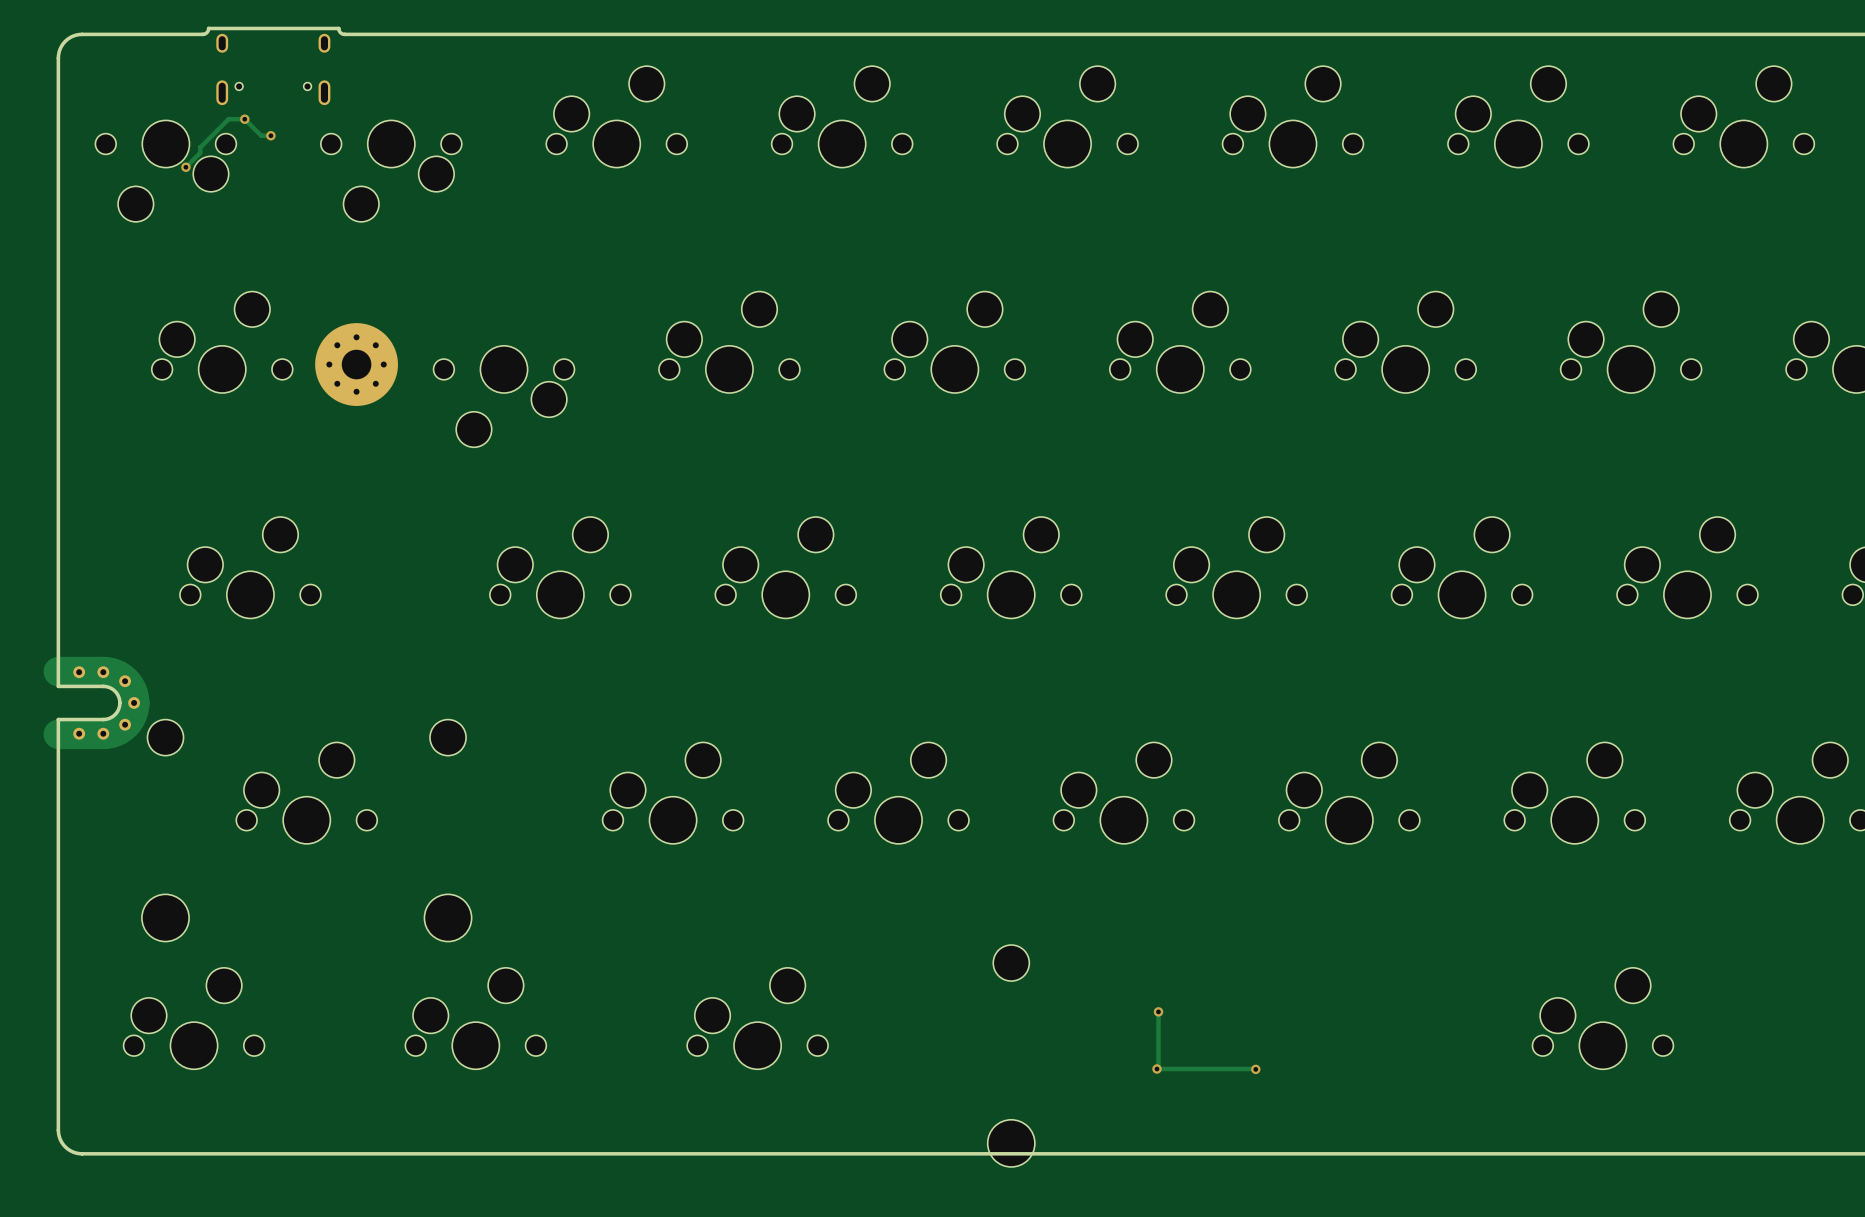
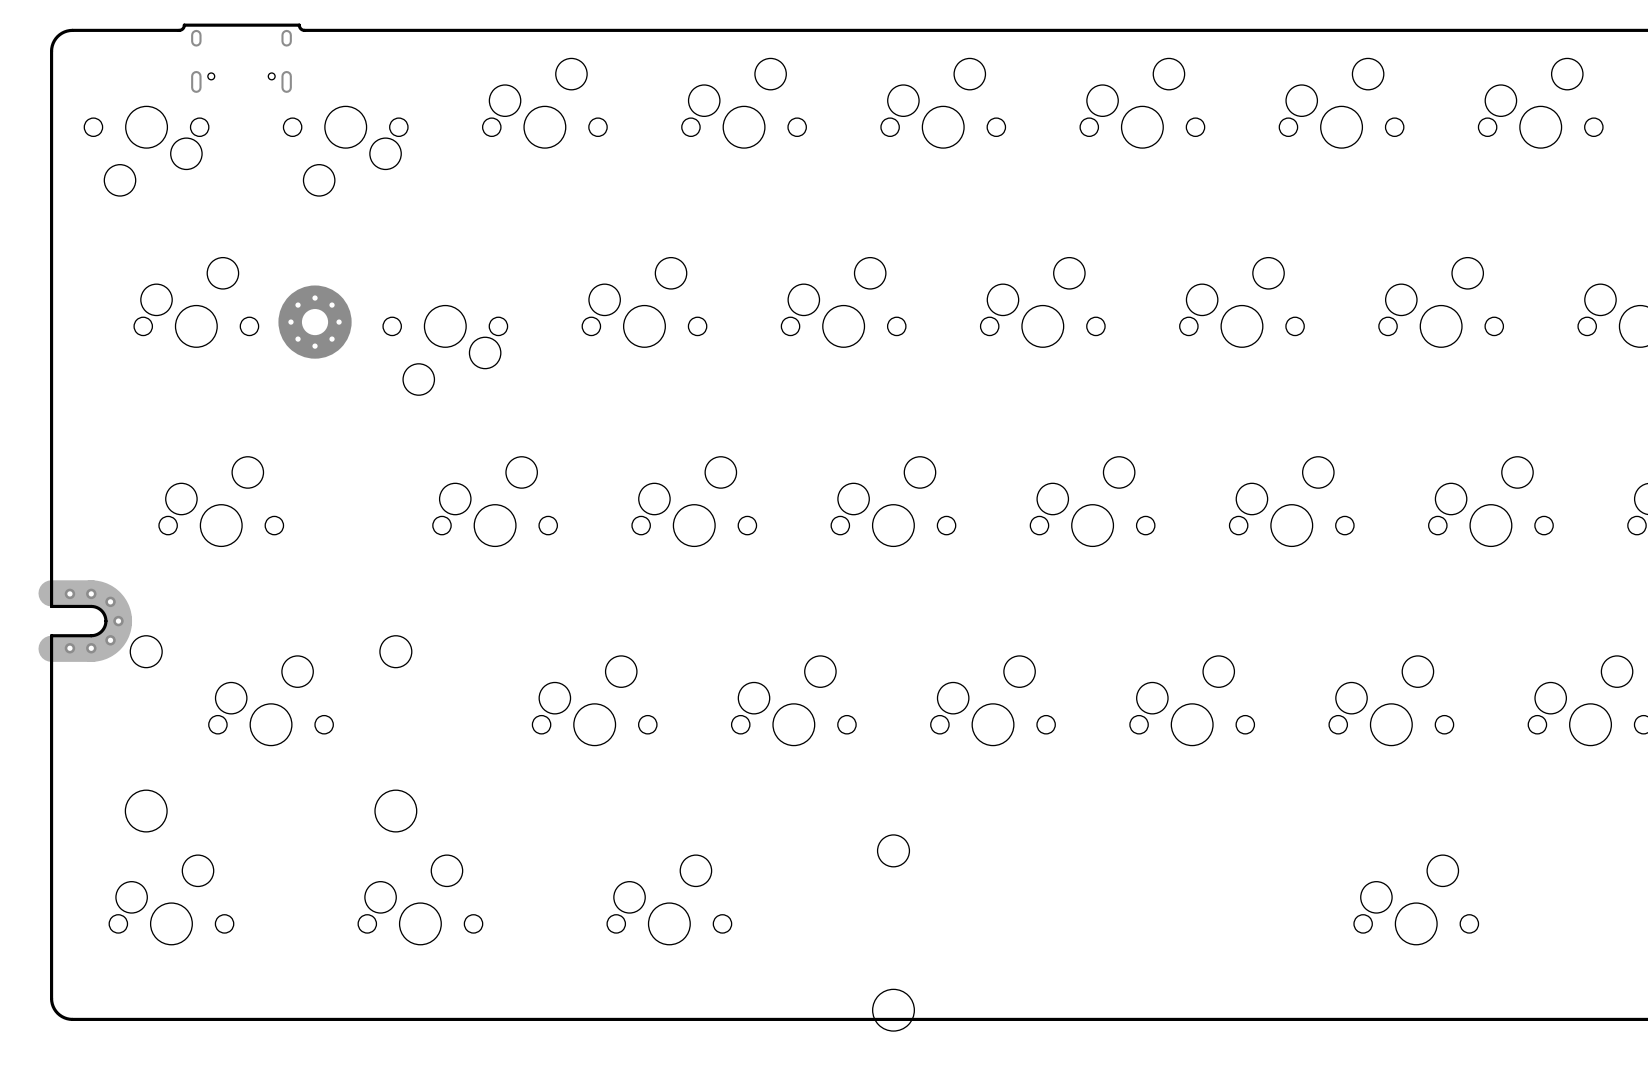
via: (244, 119) -> none
track: (270, 135) (261, 135) (244, 119) (228, 119) (200, 147) (200, 152) (185, 167) -> none
via: (270, 135) -> none
via: (185, 167) -> none
track: (1158, 1011) (1156, 1068) (1255, 1069) -> none
via: (1158, 1011) -> none
via: (1156, 1068) -> none
via: (1255, 1069) -> none

